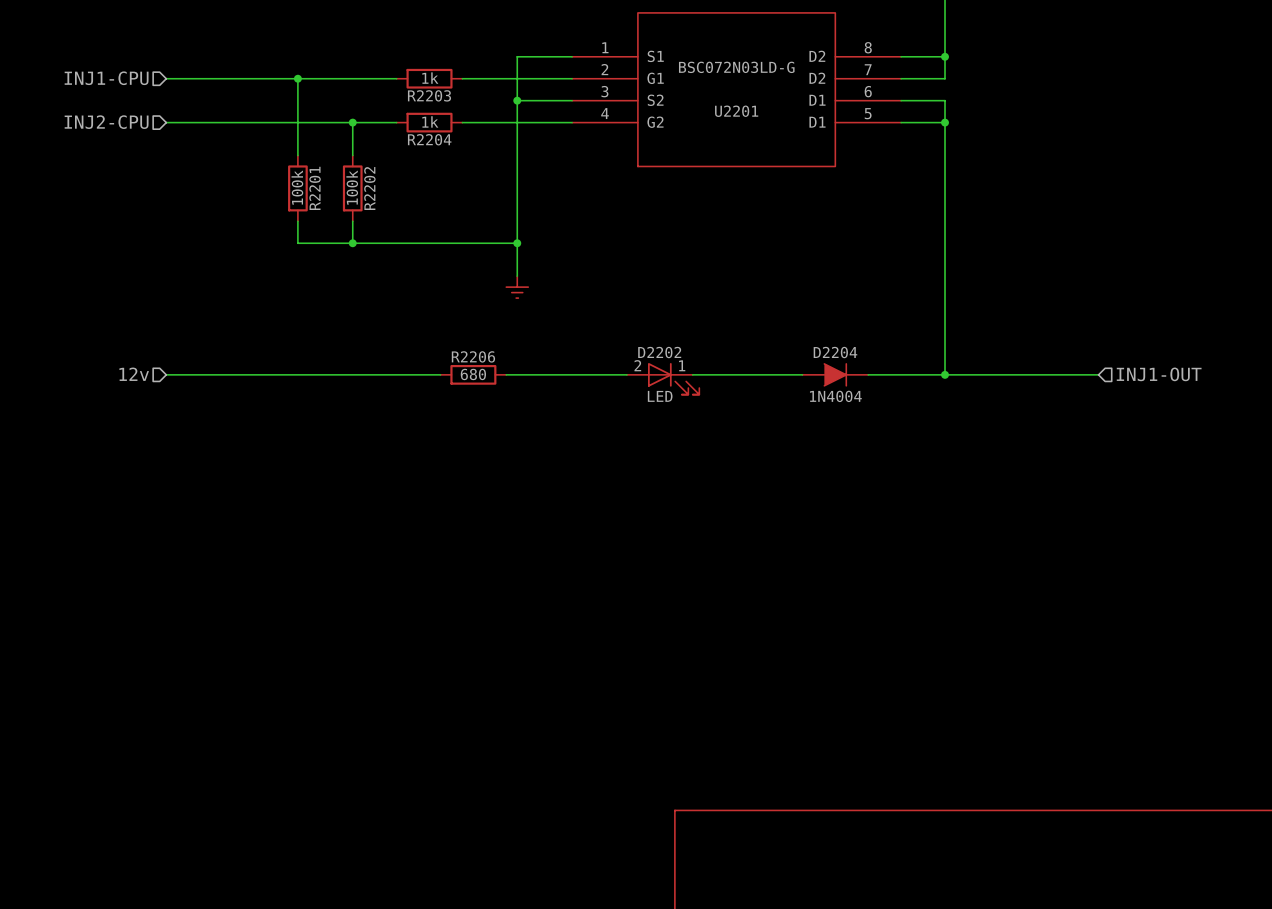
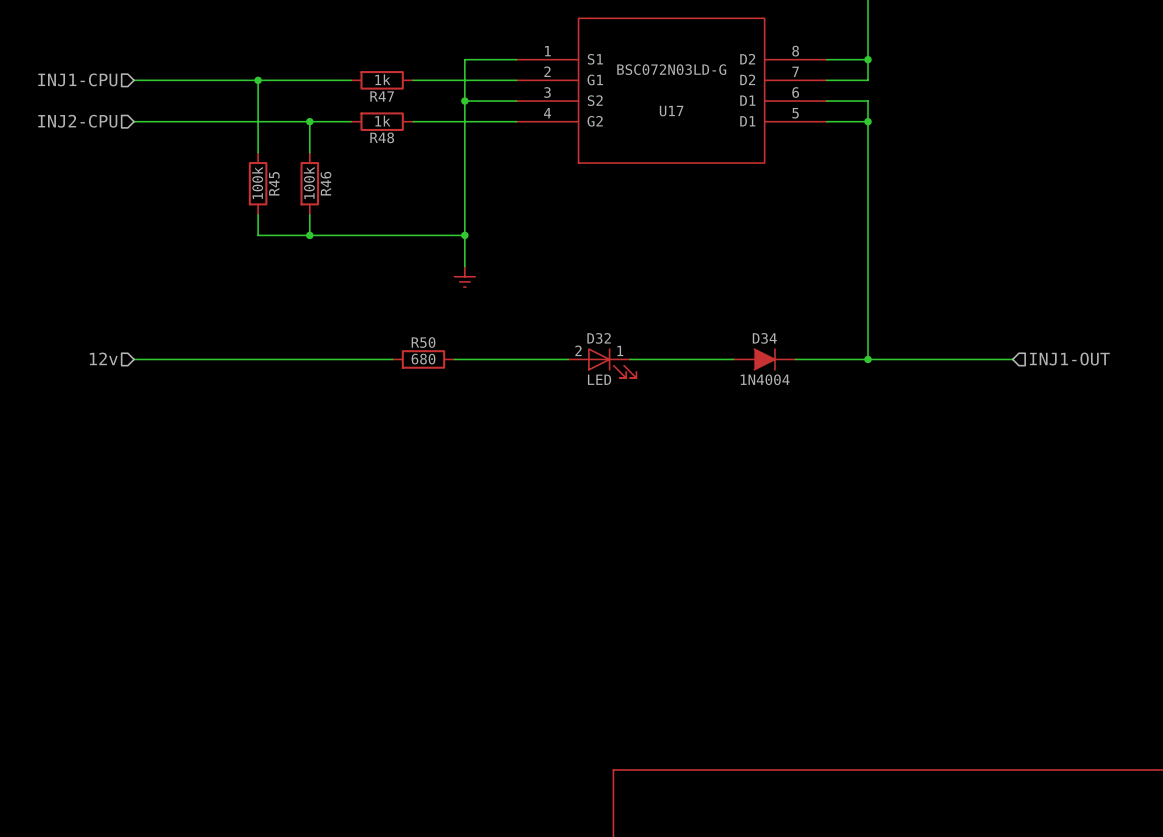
R2203 name: R2203 (429, 95) -> R47 (382, 96)
U2201 name: U2201 (736, 111) -> U17 (671, 111)
R2204 name: R2204 (429, 139) -> R48 (382, 137)
R2201 name: R2201 (315, 188) -> R45 (274, 183)
R2202 name: R2202 (369, 188) -> R46 (325, 183)
D2202 name: D2202 (659, 352) -> D32 (599, 338)
D2204 name: D2204 (835, 352) -> D34 (764, 338)
R2206 name: R2206 (473, 356) -> R50 (423, 342)

